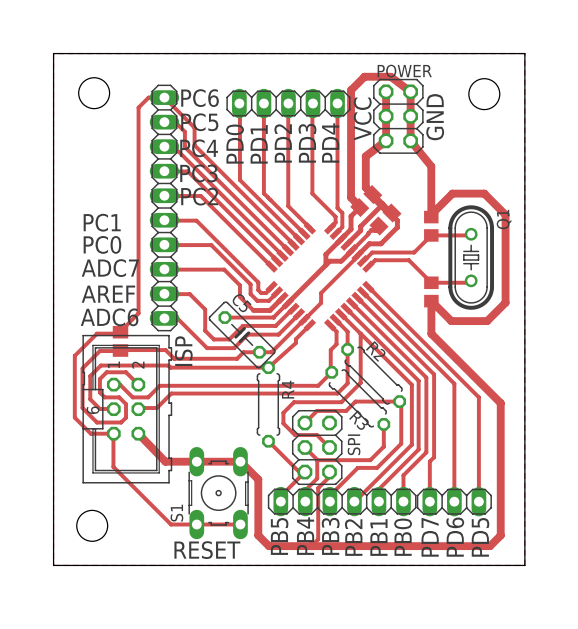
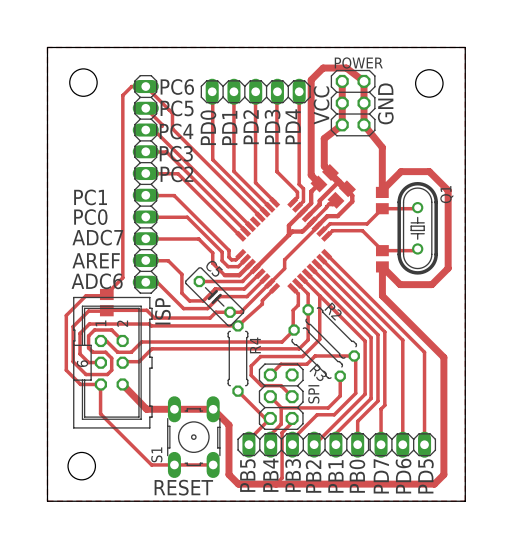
top track: (164, 122) (175, 122) (184, 131) (184, 147) (287, 250) -> (145, 108) (162, 126)

